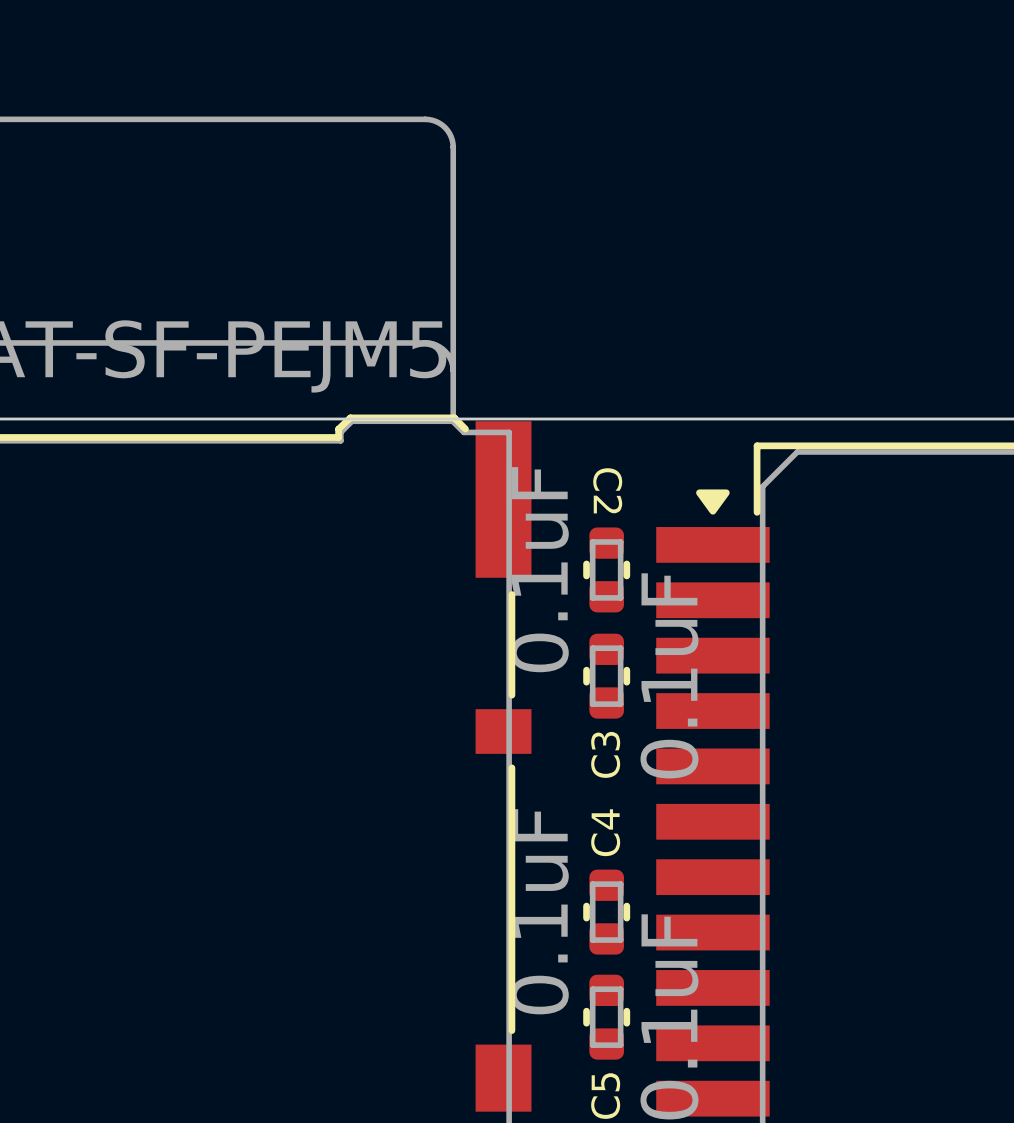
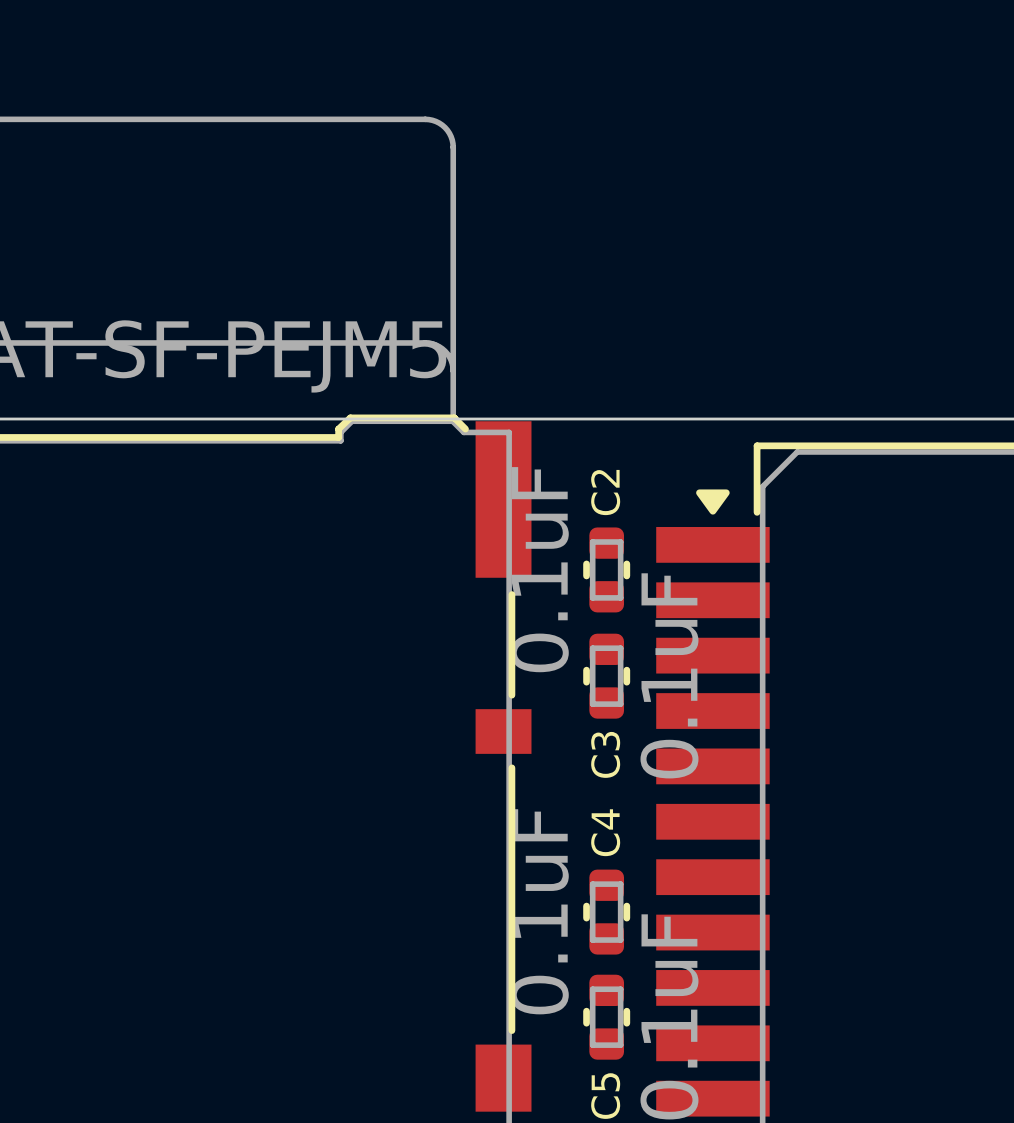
C2 name rotation: 0° (607, 490) -> 180° (605, 492)

